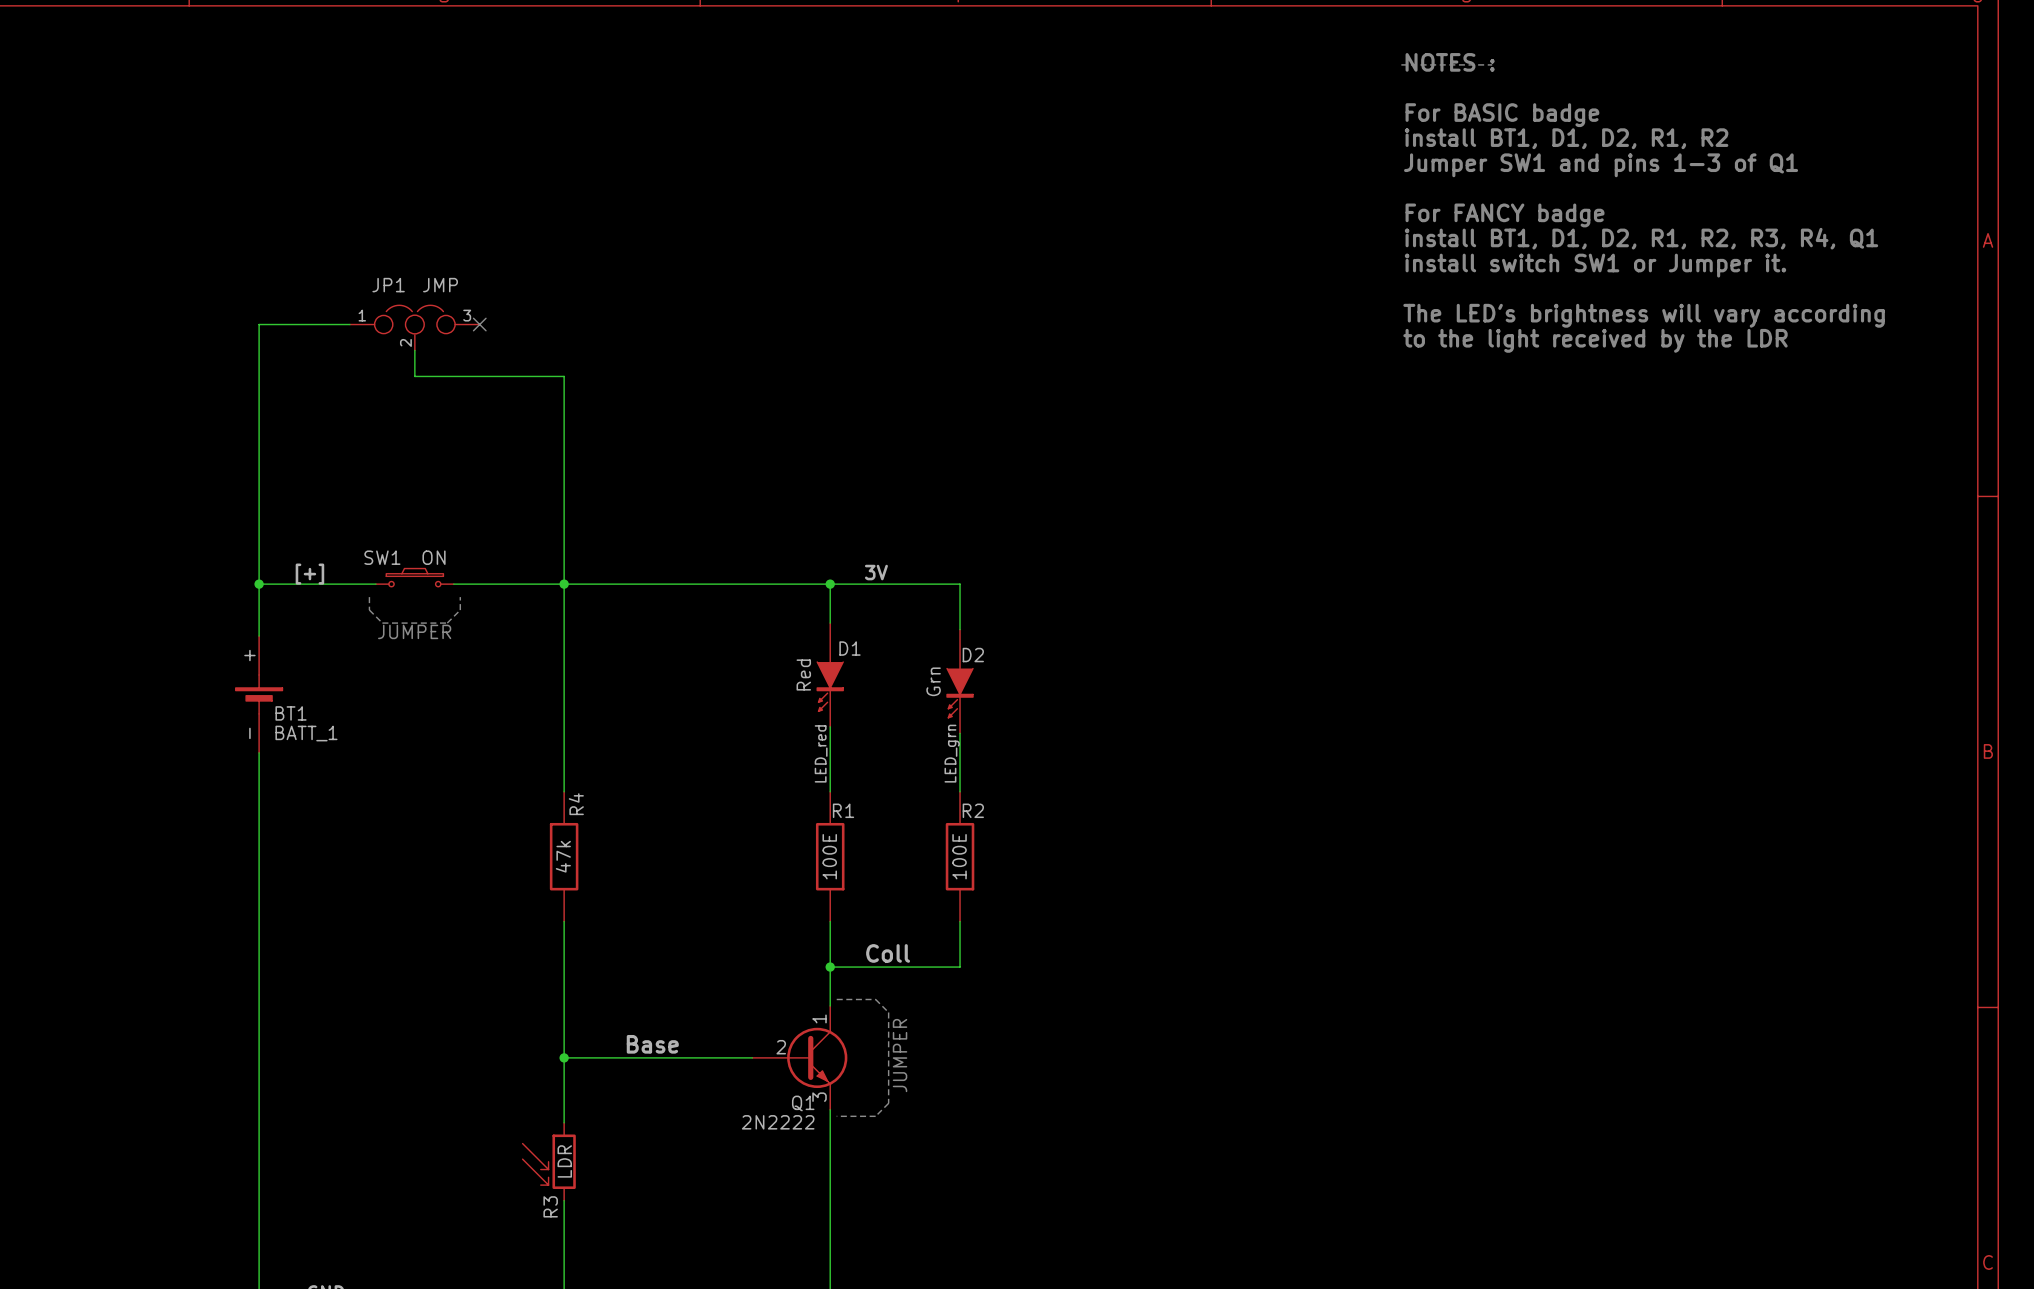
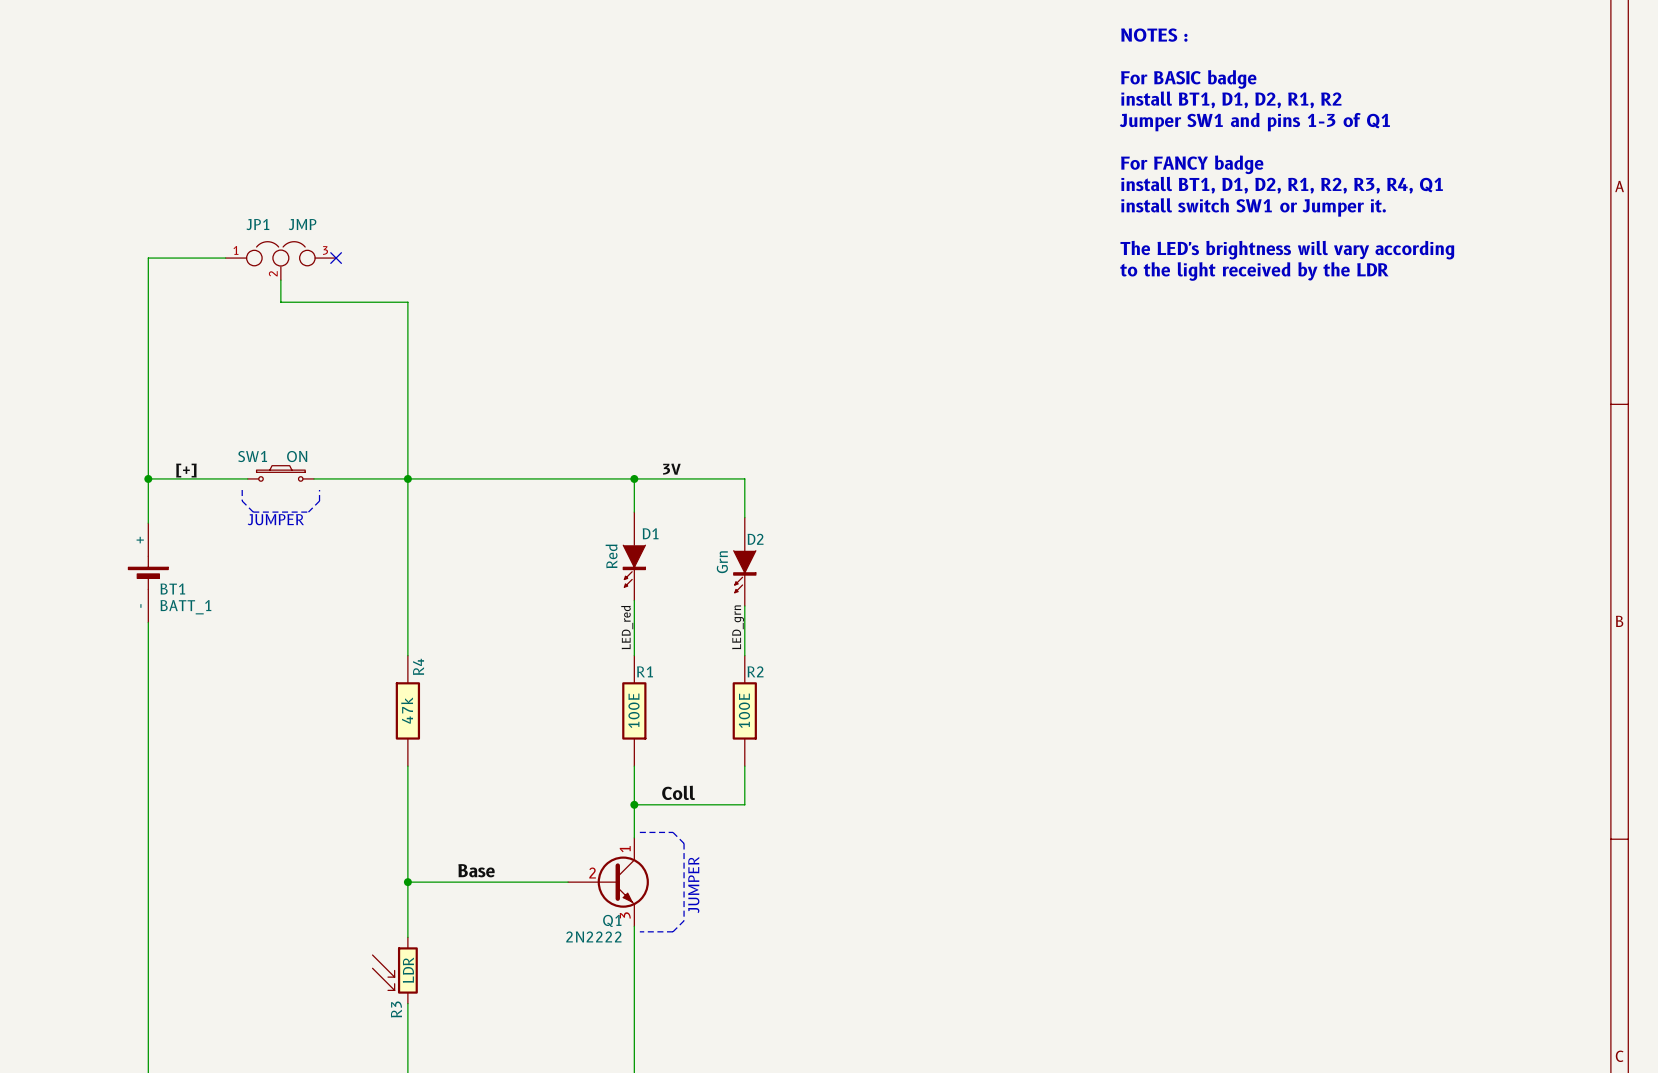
line: (1401, 64) (1492, 64) -> none

